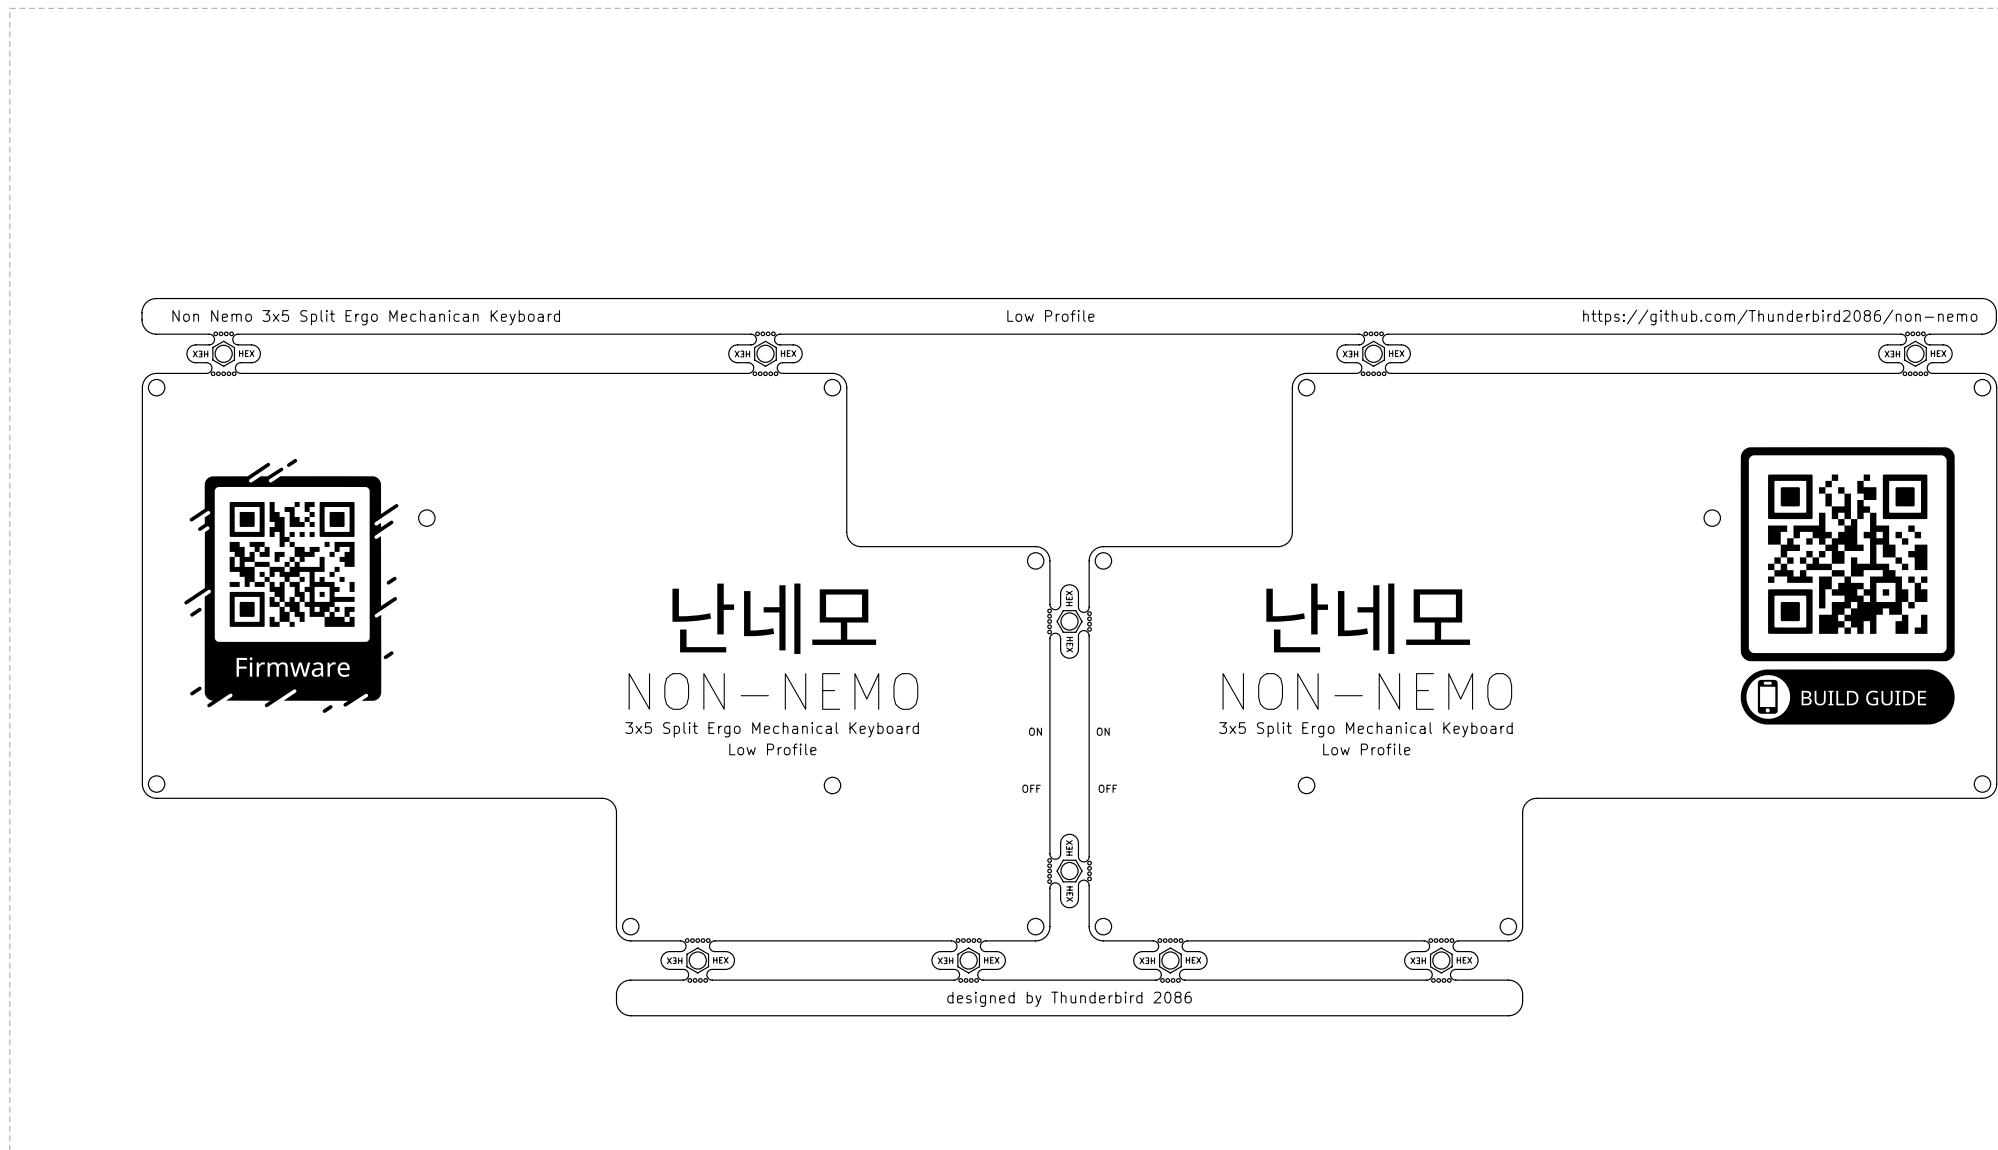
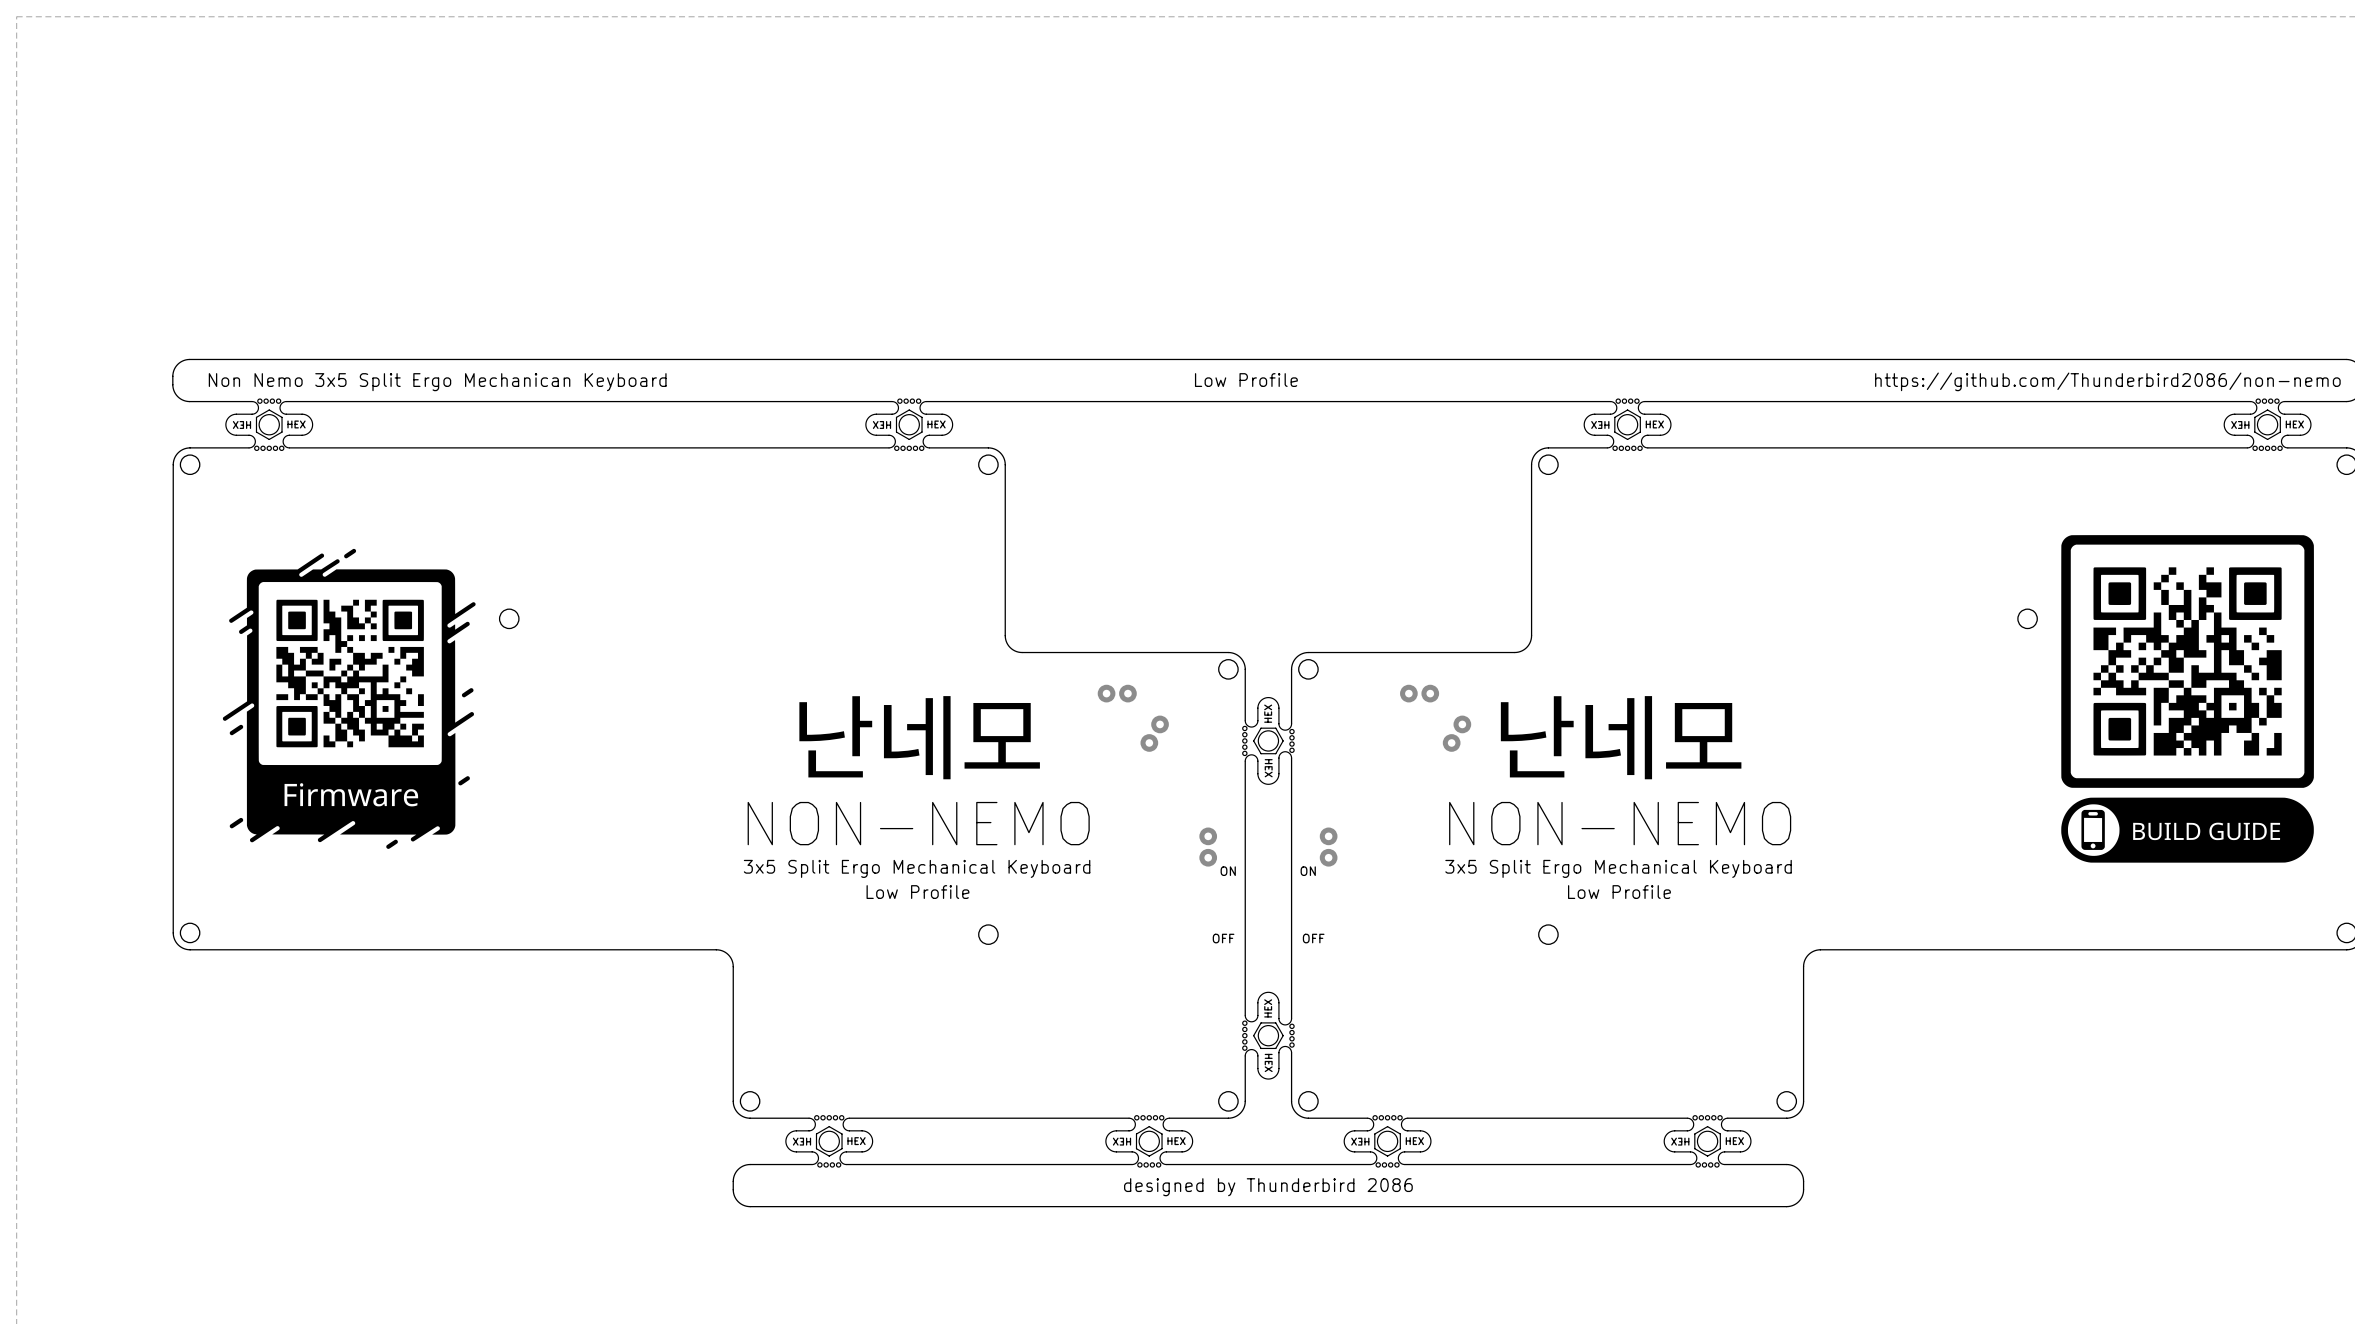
part: none -> (1117, 693)
part: none -> (1419, 693)
part: none -> (1154, 733)
part: none -> (1457, 733)
part: none -> (1208, 847)
part: none -> (1328, 847)

